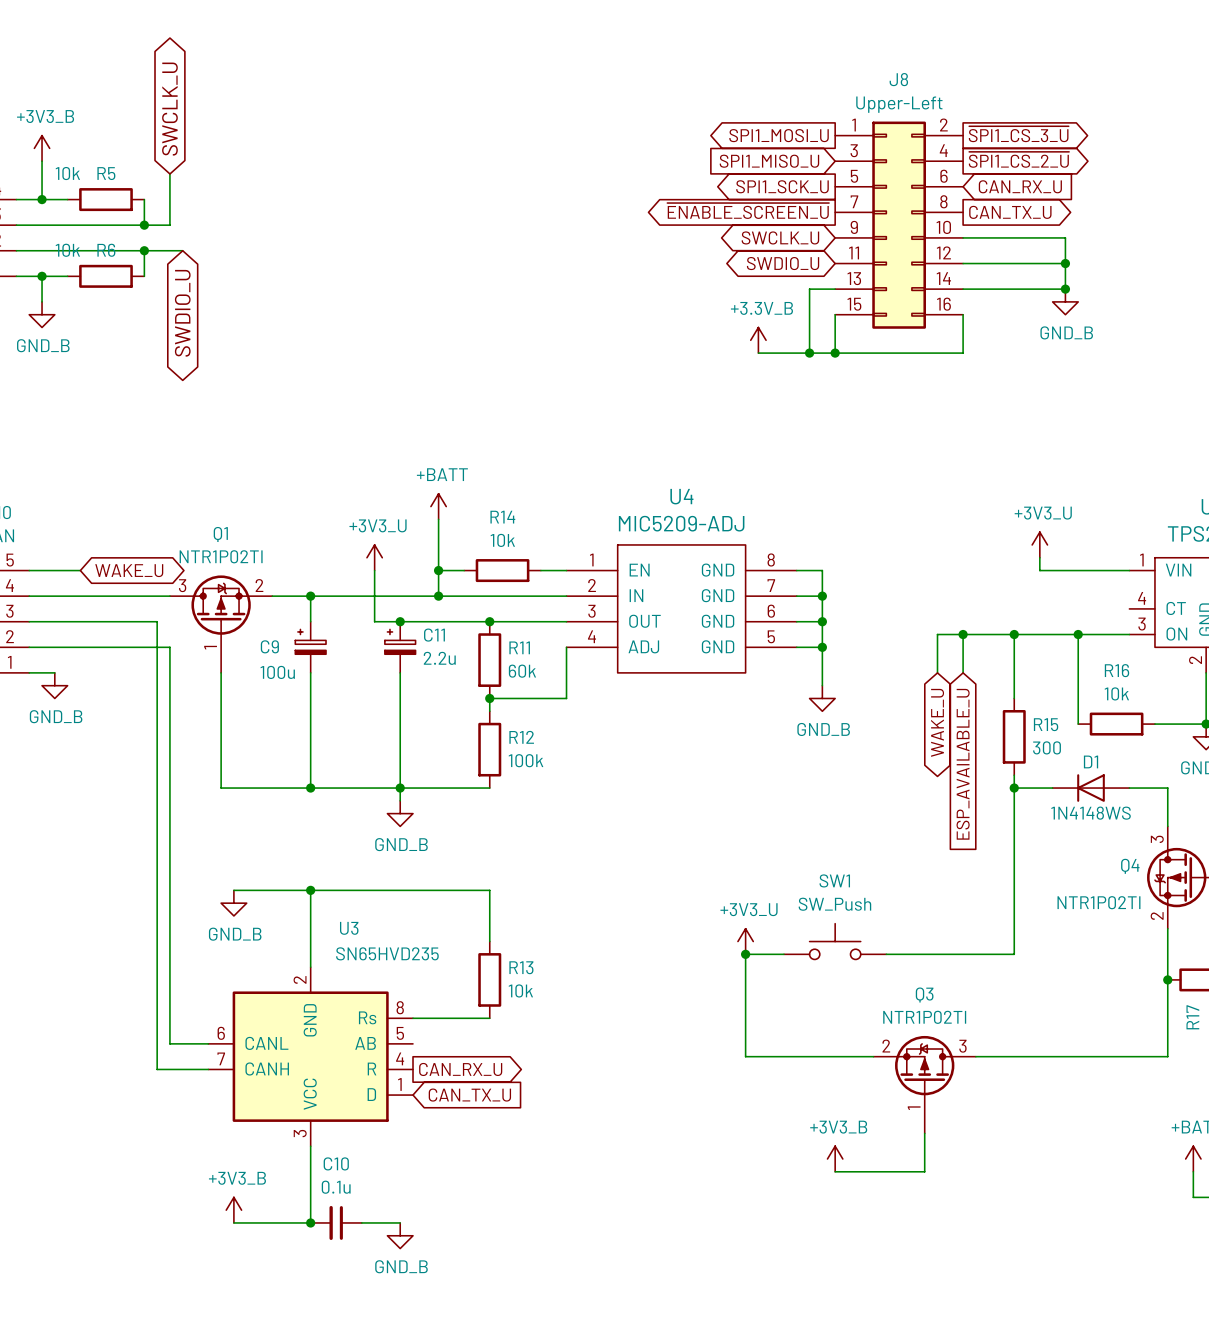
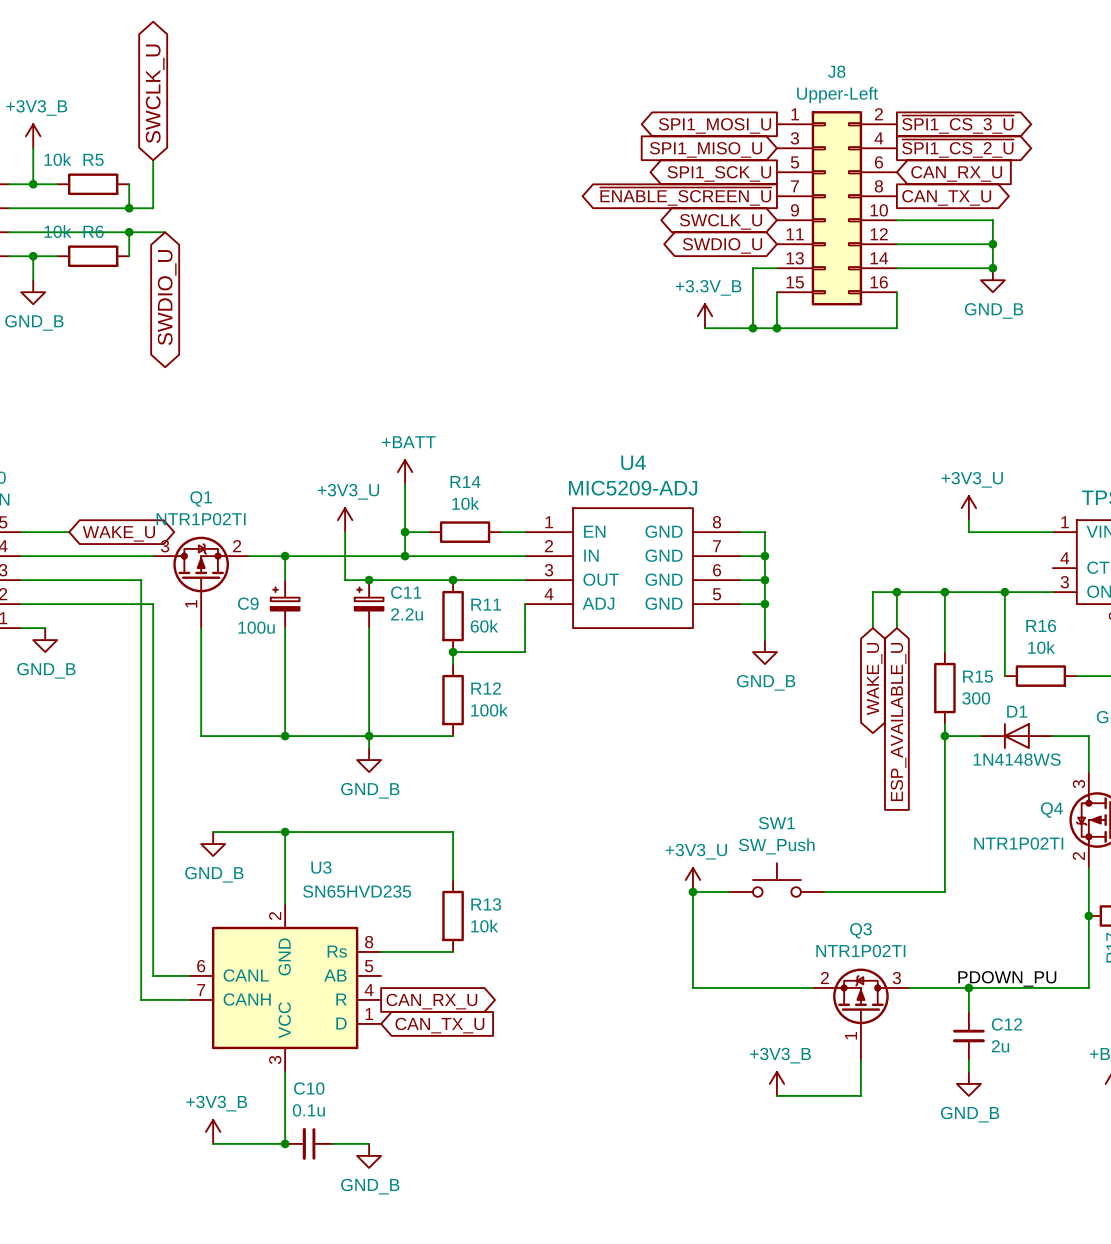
label: none -> PDOWN_PU (1007, 978)
wire: none -> (968, 987) (968, 1011)
junction: none -> (968, 987)
C12: none -> 2u (968, 1035)
wire: none -> (968, 1059) (968, 1071)
power symbol: none -> GND_B (968, 1083)

